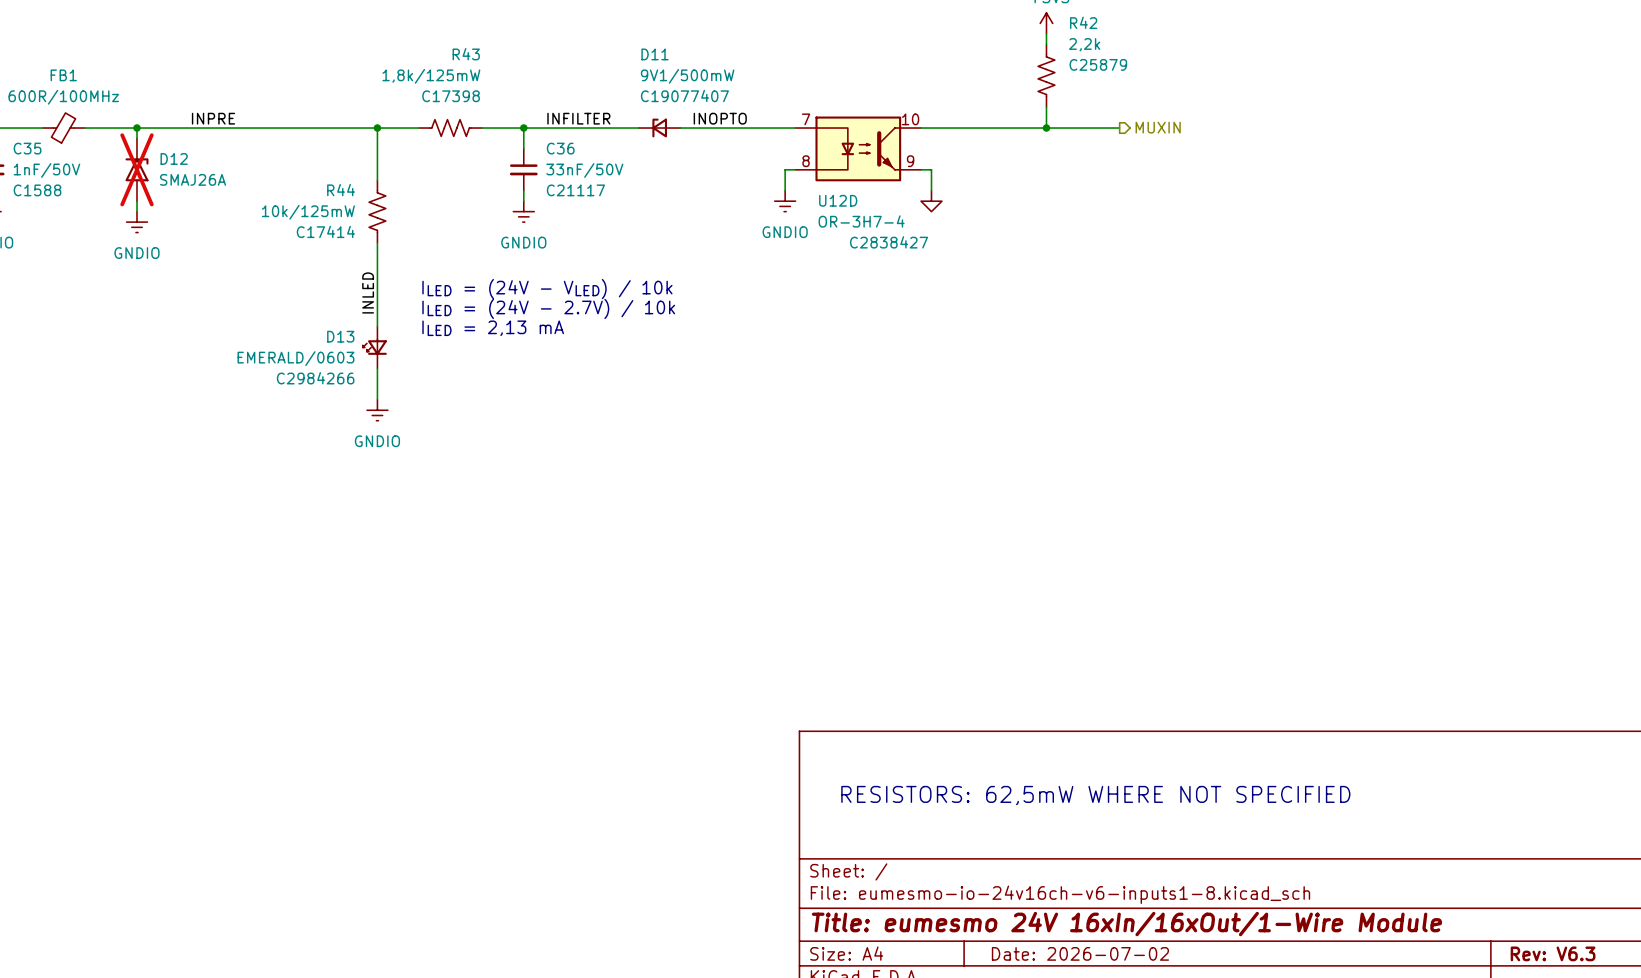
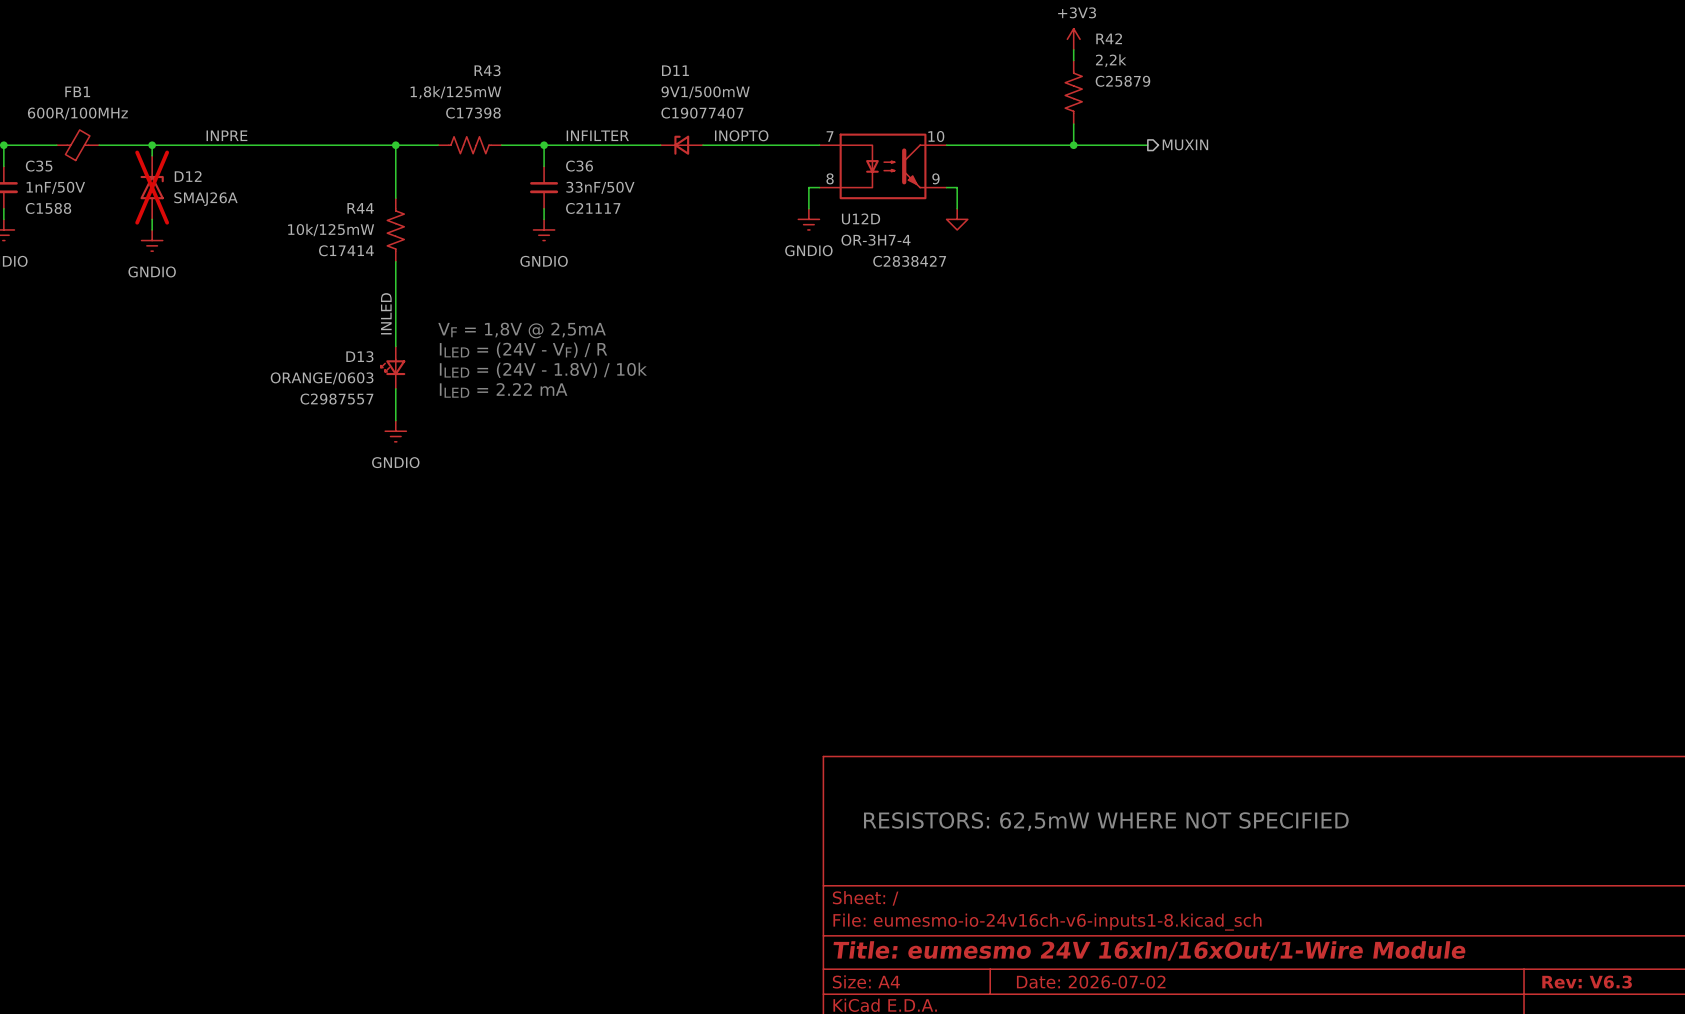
text: ILED = (24V - VLED) / 10k (547, 289) -> none
text: ILED = (24V - 2.7V) / 10k (548, 308) -> VF = 1,8V @ 2,5mA (522, 330)
text: ILED = 2,13 mA (493, 328) -> ILED = (24V - VF) / R (523, 350)
text: none -> ILED = (24V - 1.8V) / 10k (543, 370)
D13 value: EMERALD/0603 (295, 358) -> ORANGE/0603 (322, 378)
text: none -> ILED = 2.22 mA (503, 390)
D13 text: C2984266 (315, 378) -> C2987557 (336, 399)

